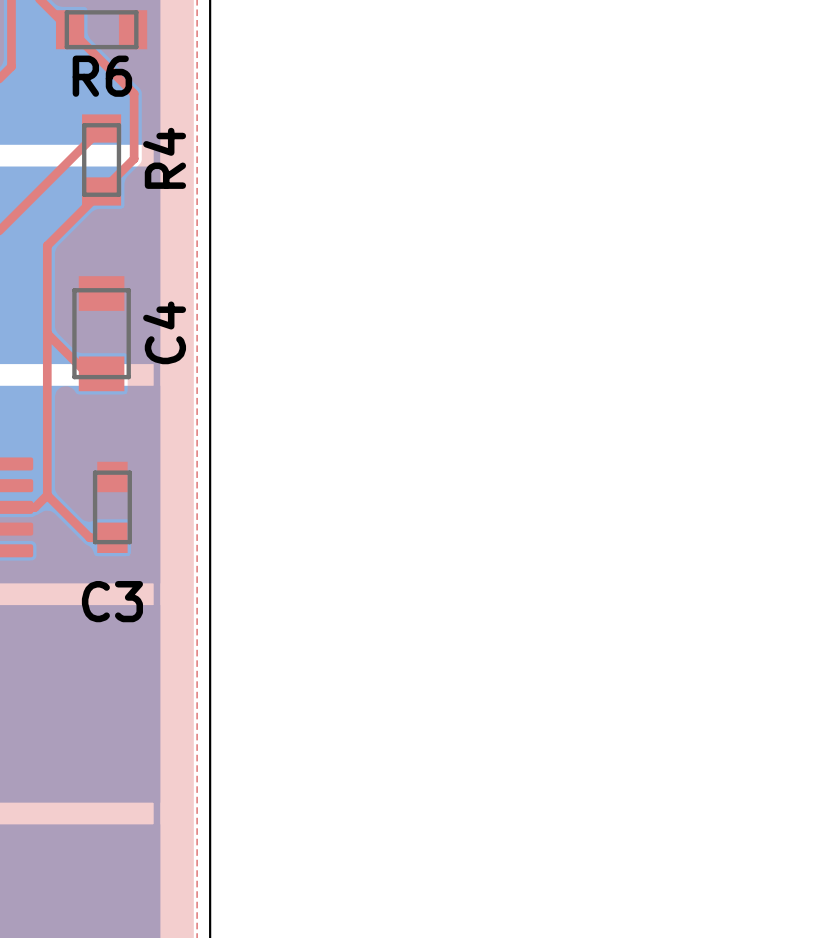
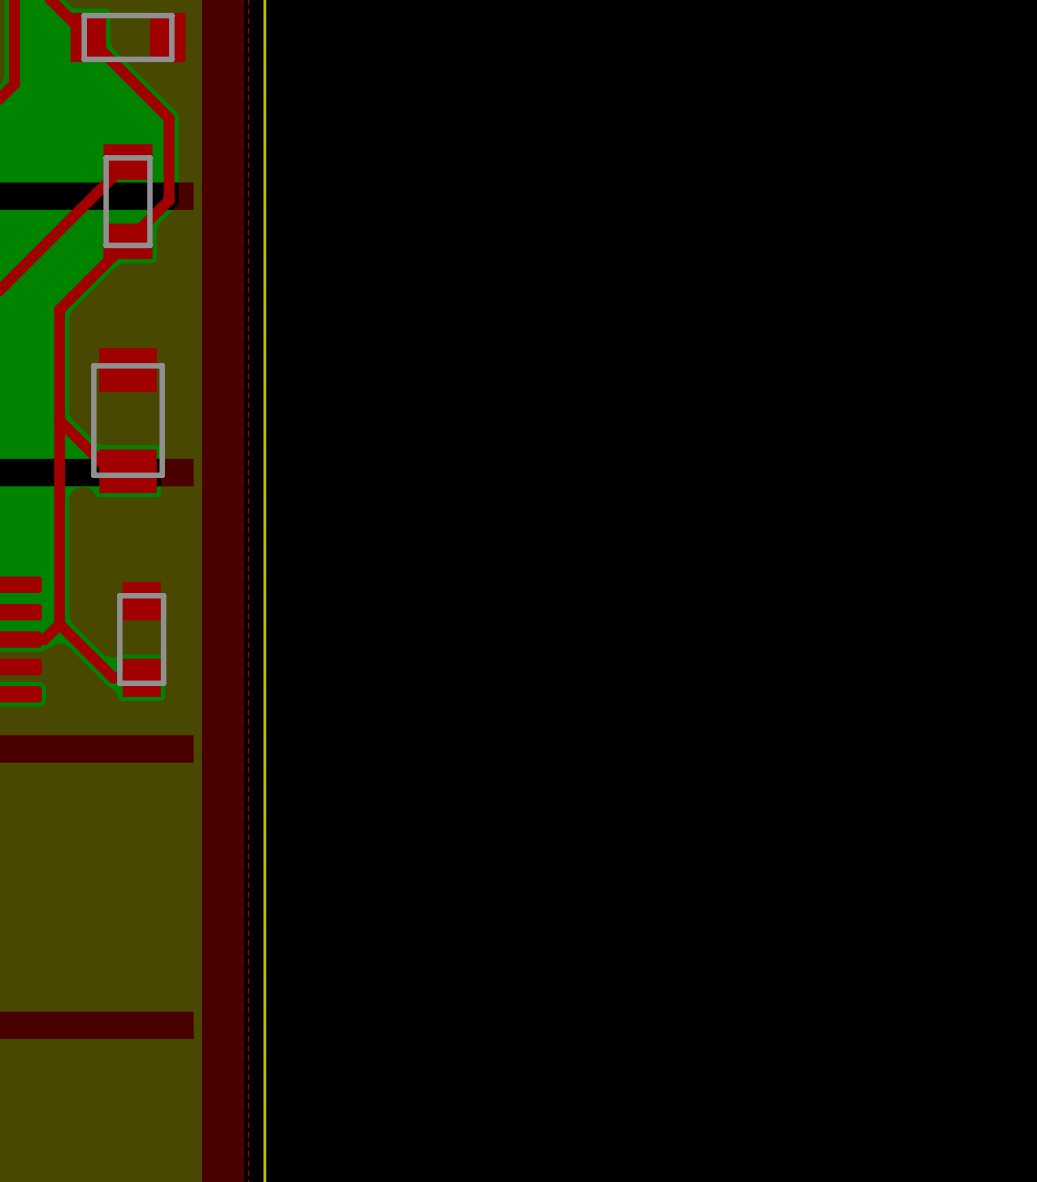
R6 name: R6 (102, 76) -> none
R4 name: R4 (164, 158) -> none
C4 name: C4 (164, 332) -> none
C3 name: C3 (112, 601) -> none

